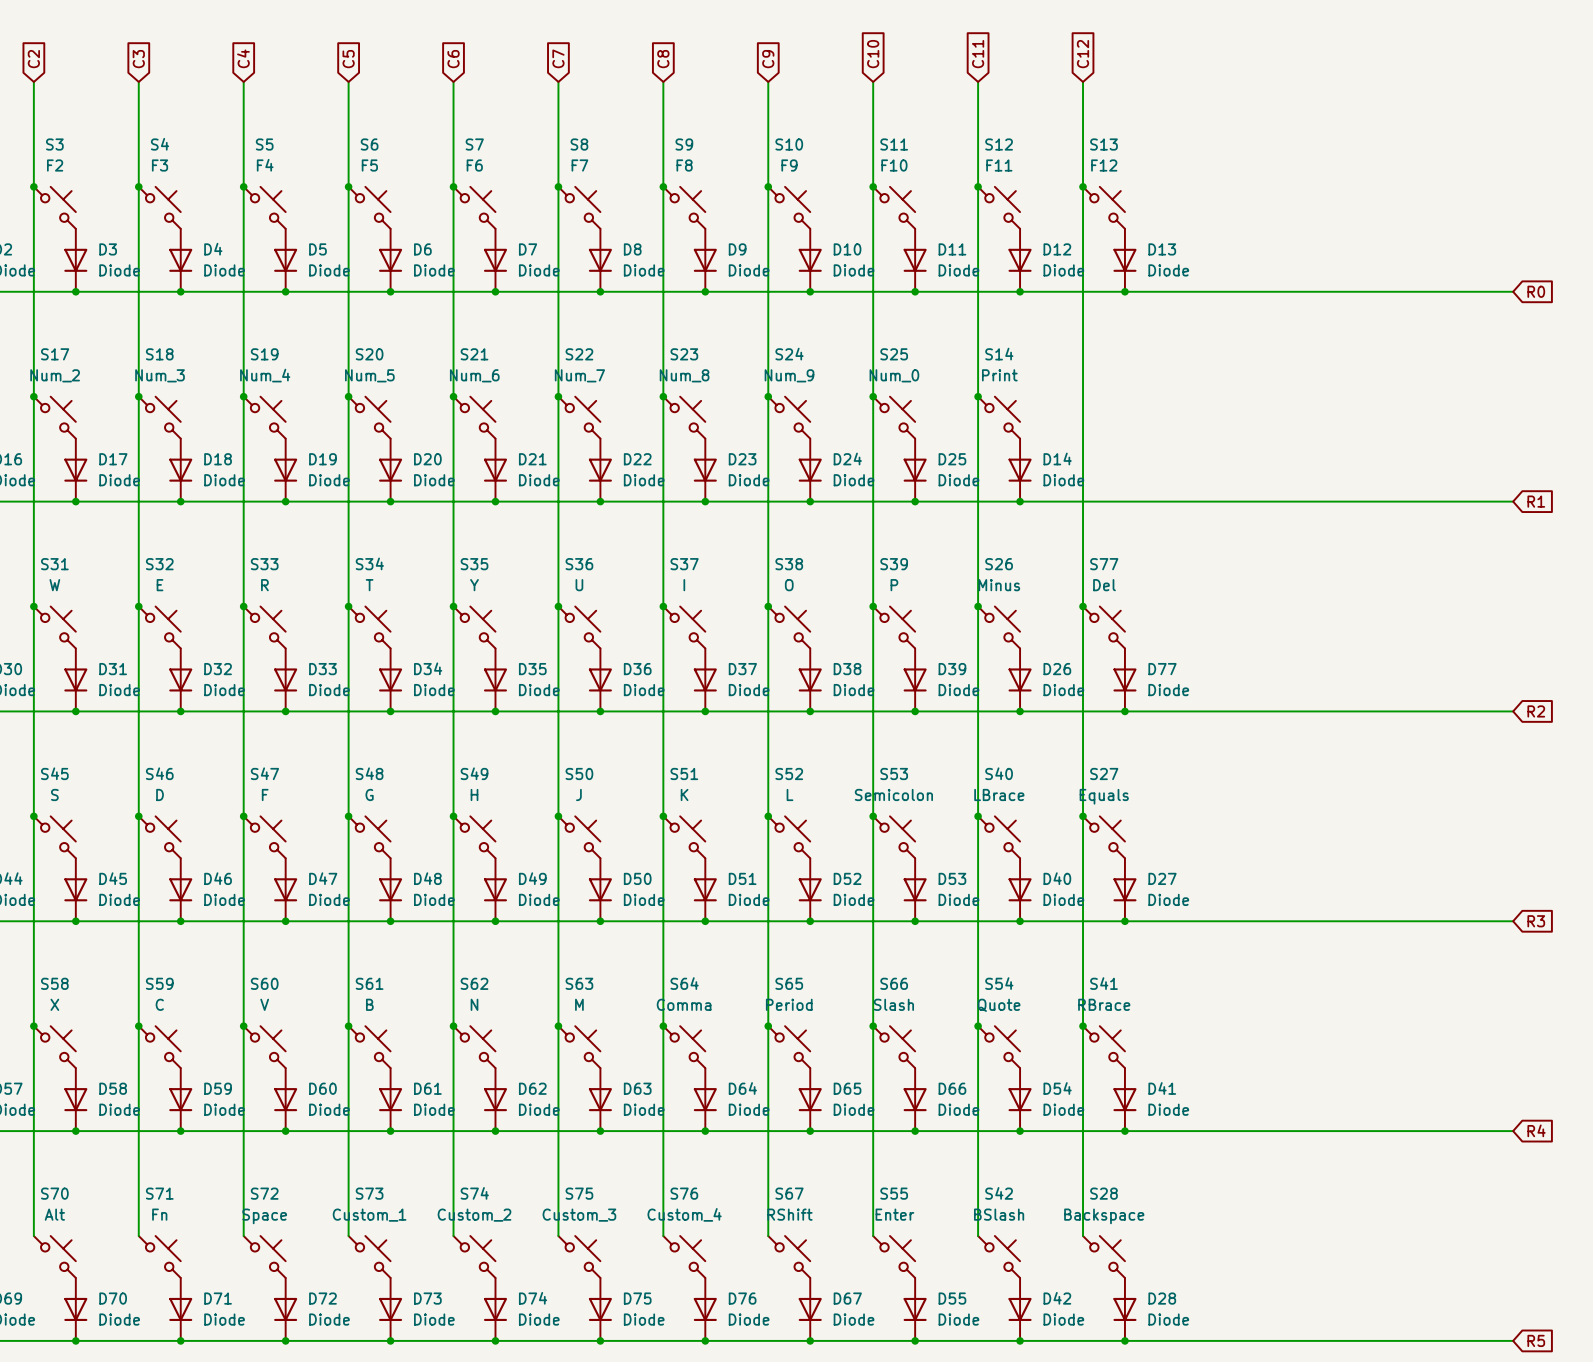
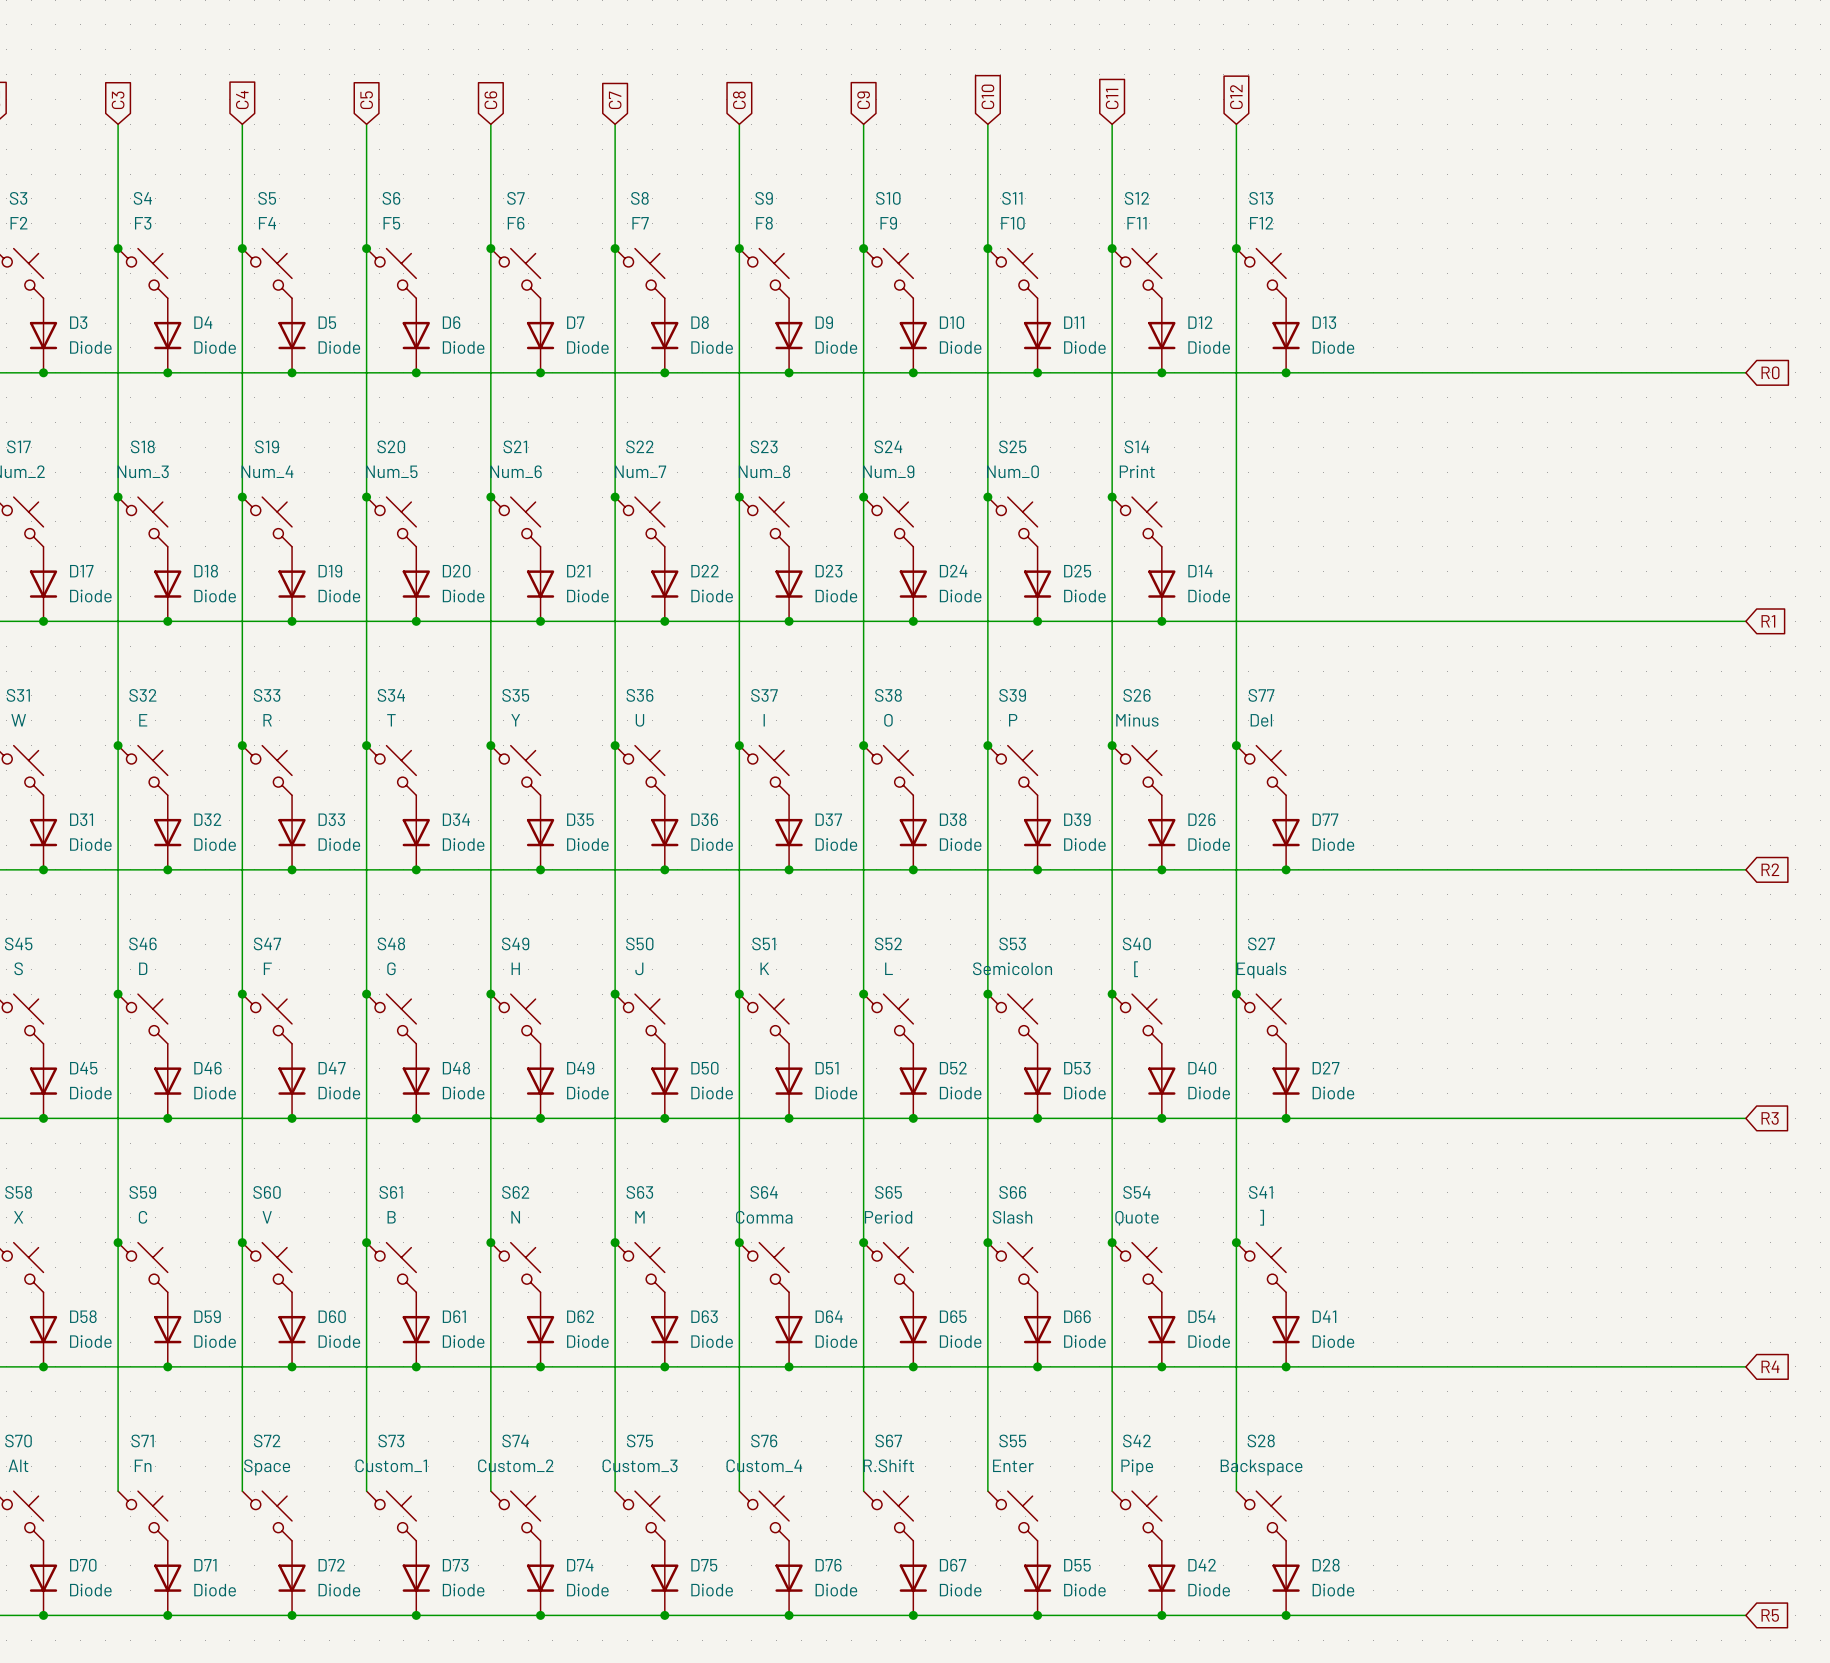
S40 value: LBrace (999, 794) -> [ (1136, 969)
S41 value: RBrace (1104, 1004) -> ] (1262, 1217)
S67 value: RShift (790, 1214) -> R.Shift (888, 1465)
S42 value: BSlash (999, 1214) -> Pipe (1137, 1467)

